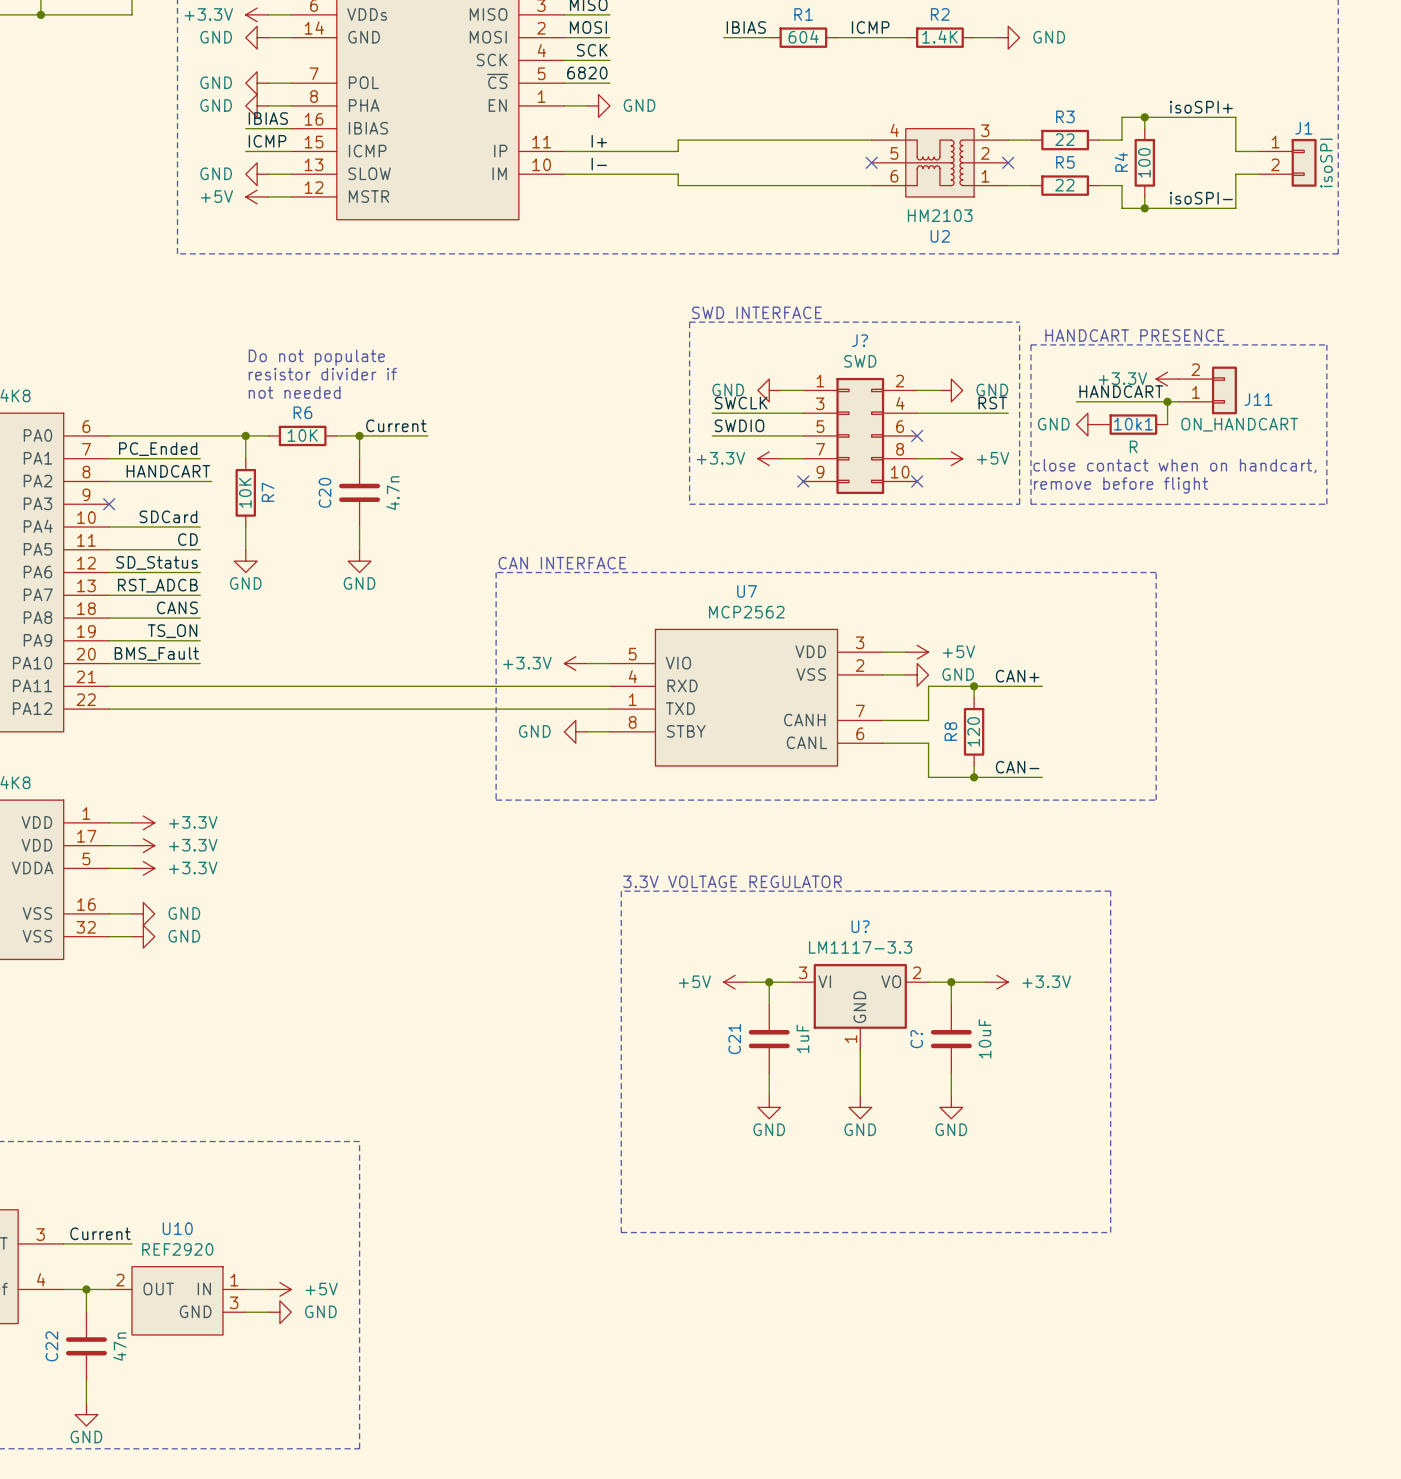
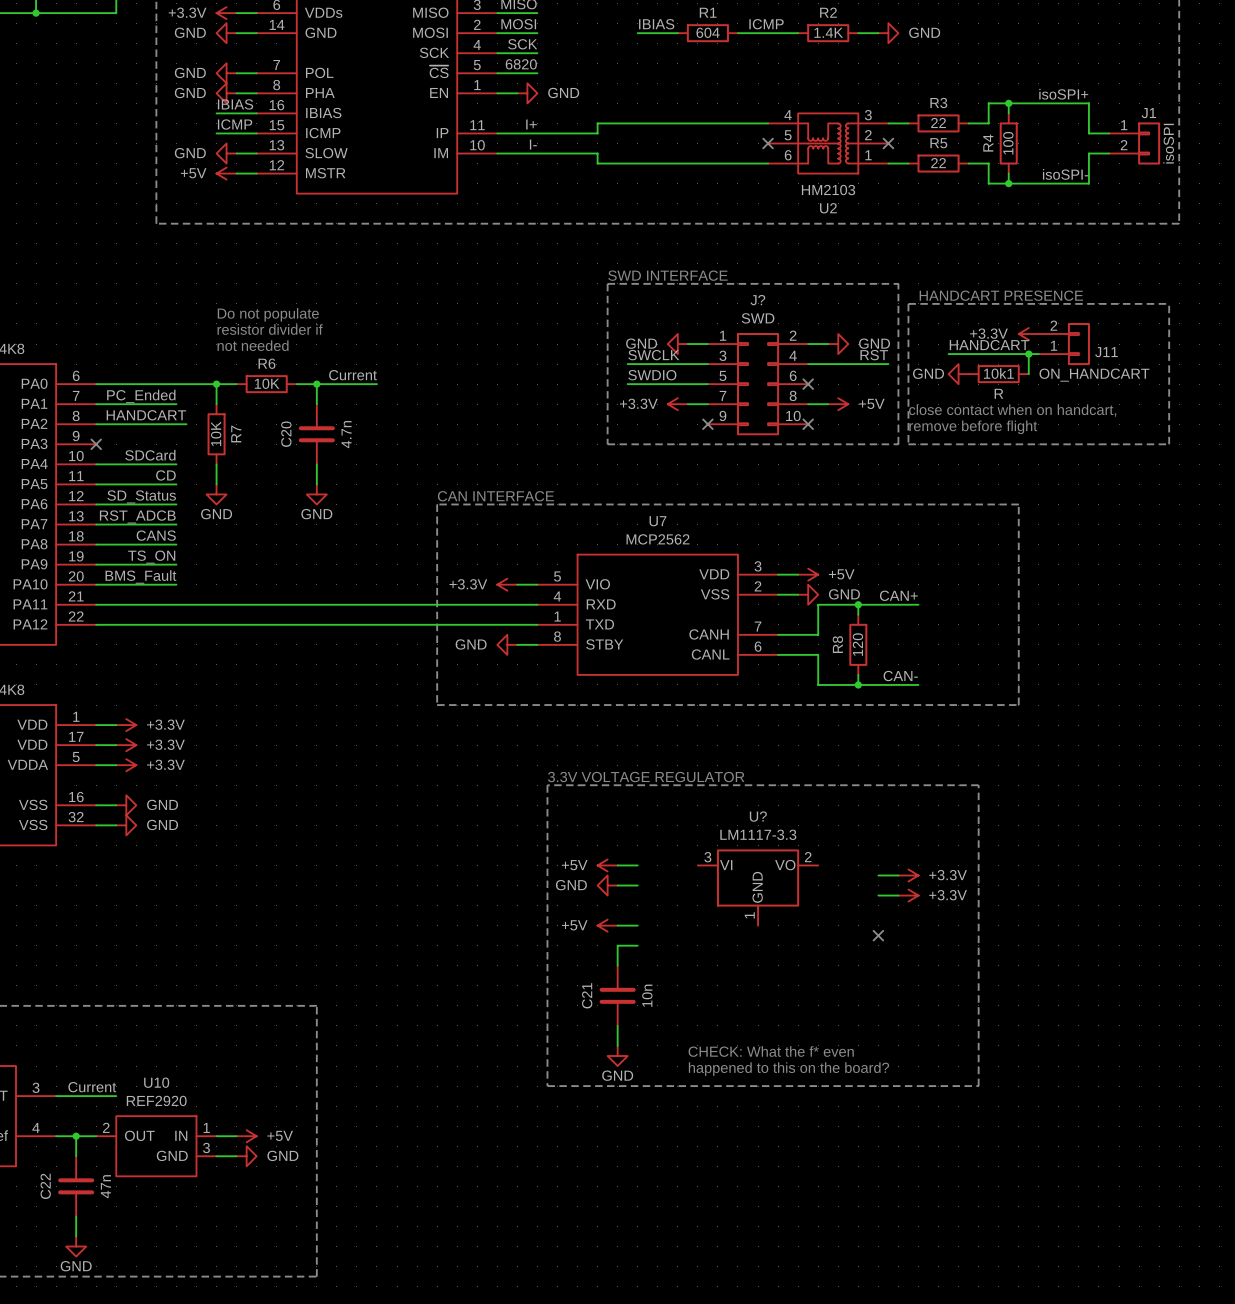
power symbol: none -> +5V (607, 865)
wire: none -> (617, 865) (637, 865)
power symbol: +5V (735, 982) -> none
wire: (746, 982) (792, 982) -> none
wire: (769, 982) (769, 1004) -> none
junction: (769, 982) -> none
wire: (928, 982) (985, 982) -> none
wire: (951, 982) (951, 1004) -> none
junction: (951, 982) -> none
power symbol: +3.3V (996, 982) -> none
wire: none -> (878, 875) (898, 875)
power symbol: none -> +3.3V (908, 875)
power symbol: none -> GND (607, 885)
wire: none -> (617, 885) (637, 885)
wire: none -> (878, 895) (898, 895)
power symbol: none -> +3.3V (908, 895)
C21 value: 1uF (802, 1038) -> 10n (647, 995)
C21 position: (769, 1039) -> (617, 995)
C?: 10uF (951, 1039) -> none
power symbol: none -> +5V (607, 925)
wire: none -> (617, 925) (637, 925)
wire: (860, 1050) (860, 1096) -> none
no-connect mark: none -> (878, 935)
wire: none -> (637, 945) (617, 945) (617, 965)
wire: (769, 1073) (769, 1096) -> (617, 1025) (617, 1045)
wire: (951, 1073) (951, 1096) -> none
power symbol: GND (769, 1107) -> none
power symbol: GND (860, 1107) -> none
power symbol: GND (951, 1107) -> none
text: none -> CHECK: What the f* even (771, 1051)
power symbol: none -> GND (617, 1055)
text: none -> happened to this on the board? (788, 1069)

